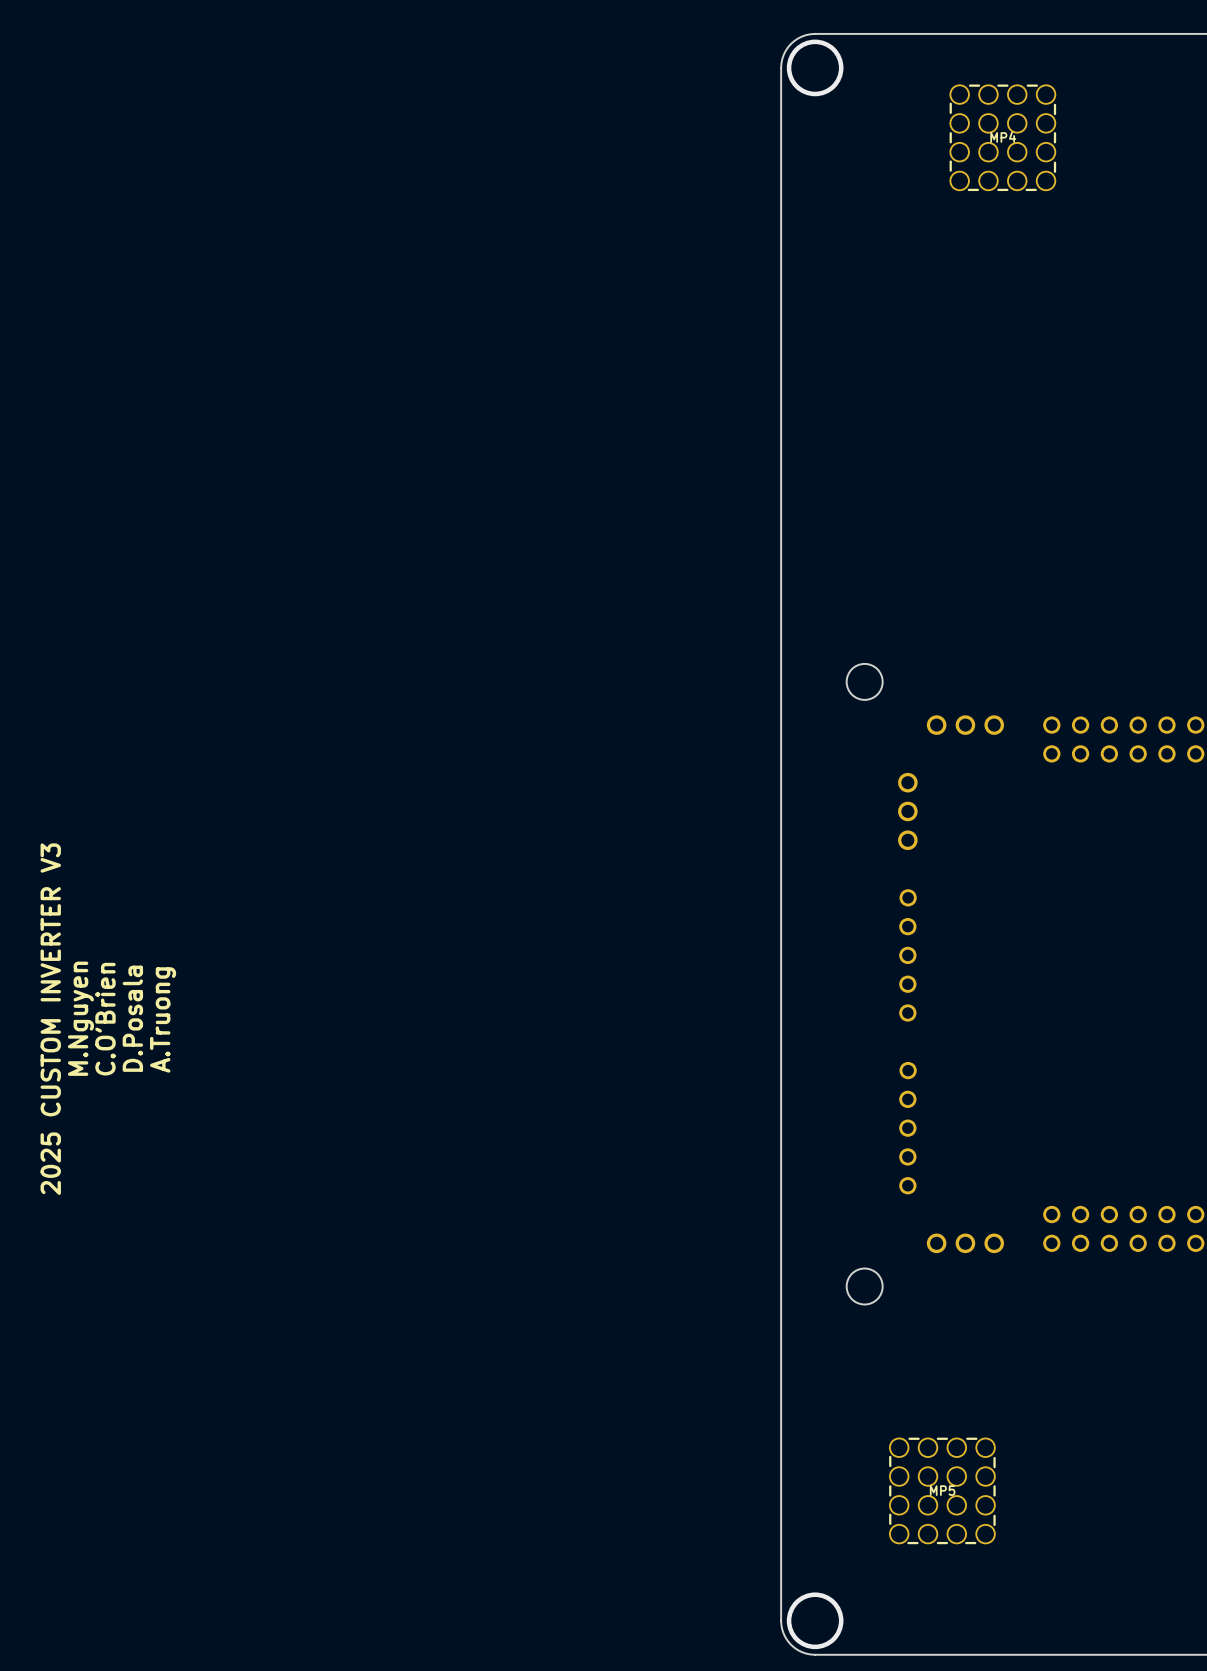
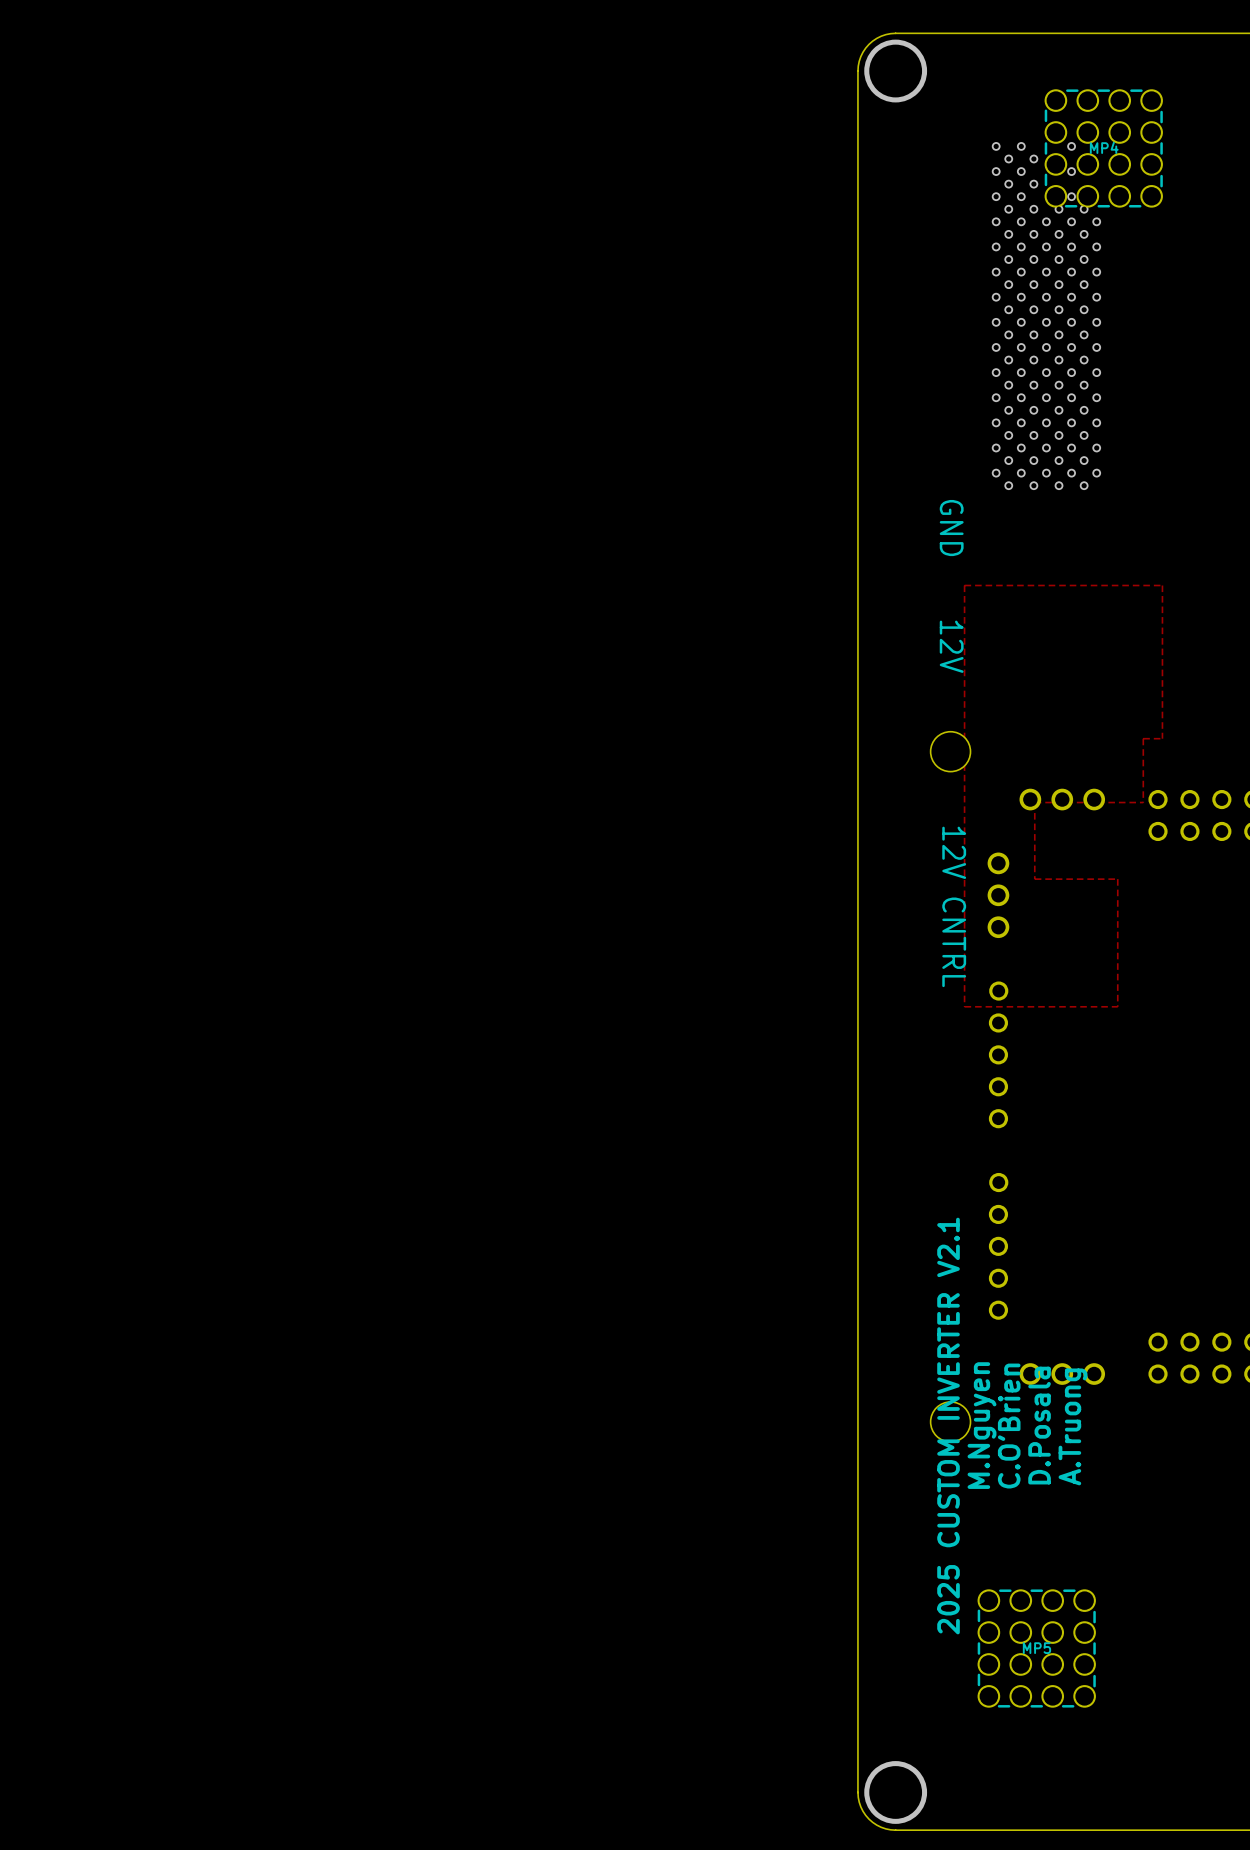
via: none -> (996, 146)
via: none -> (1021, 146)
via: none -> (1071, 146)
via: none -> (1008, 158)
via: none -> (1033, 158)
via: none -> (996, 171)
via: none -> (1021, 171)
via: none -> (1071, 171)
via: none -> (1008, 184)
via: none -> (1033, 184)
via: none -> (996, 196)
via: none -> (1021, 196)
via: none -> (1071, 196)
via: none -> (1008, 209)
via: none -> (1033, 209)
via: none -> (1059, 209)
via: none -> (1084, 209)
via: none -> (996, 221)
via: none -> (1021, 221)
via: none -> (1046, 221)
via: none -> (1071, 221)
via: none -> (1096, 221)
via: none -> (1008, 234)
via: none -> (1033, 234)
via: none -> (1059, 234)
via: none -> (1084, 234)
via: none -> (996, 246)
via: none -> (1021, 246)
via: none -> (1046, 246)
via: none -> (1071, 246)
via: none -> (1096, 246)
via: none -> (1008, 259)
via: none -> (1033, 259)
via: none -> (1059, 259)
via: none -> (1084, 259)
via: none -> (996, 272)
via: none -> (1021, 272)
via: none -> (1046, 272)
via: none -> (1071, 272)
via: none -> (1096, 272)
via: none -> (1008, 284)
via: none -> (1033, 284)
via: none -> (1059, 284)
via: none -> (1084, 284)
via: none -> (996, 297)
via: none -> (1021, 297)
via: none -> (1046, 297)
via: none -> (1071, 297)
via: none -> (1096, 297)
via: none -> (1008, 309)
via: none -> (1033, 309)
via: none -> (1059, 309)
via: none -> (1084, 309)
via: none -> (996, 322)
via: none -> (1021, 322)
via: none -> (1046, 322)
via: none -> (1071, 322)
via: none -> (1096, 322)
via: none -> (1008, 334)
via: none -> (1033, 334)
via: none -> (1059, 334)
via: none -> (1084, 334)
via: none -> (996, 347)
via: none -> (1021, 347)
via: none -> (1046, 347)
via: none -> (1071, 347)
via: none -> (1096, 347)
via: none -> (1008, 360)
via: none -> (1033, 360)
via: none -> (1059, 360)
via: none -> (1084, 360)
via: none -> (996, 372)
via: none -> (1021, 372)
via: none -> (1046, 372)
via: none -> (1071, 372)
via: none -> (1096, 372)
via: none -> (1008, 385)
via: none -> (1033, 385)
via: none -> (1059, 385)
via: none -> (1084, 385)
via: none -> (996, 397)
via: none -> (1021, 397)
via: none -> (1046, 397)
via: none -> (1071, 397)
via: none -> (1096, 397)
via: none -> (1008, 410)
via: none -> (1033, 410)
via: none -> (1059, 410)
via: none -> (1084, 410)
via: none -> (996, 422)
via: none -> (1021, 422)
via: none -> (1046, 422)
via: none -> (1071, 422)
via: none -> (1096, 422)
via: none -> (1008, 435)
via: none -> (1033, 435)
via: none -> (1059, 435)
via: none -> (1084, 435)
via: none -> (996, 447)
via: none -> (1021, 447)
via: none -> (1046, 447)
via: none -> (1071, 447)
via: none -> (1096, 447)
via: none -> (1008, 460)
via: none -> (1033, 460)
via: none -> (1059, 460)
via: none -> (1084, 460)
via: none -> (996, 473)
via: none -> (1021, 473)
via: none -> (1046, 473)
via: none -> (1071, 473)
via: none -> (1096, 473)
via: none -> (1008, 485)
via: none -> (1033, 485)
via: none -> (1059, 485)
via: none -> (1084, 485)
text: none -> GND (951, 528)
zone outline: none -> (964, 585) (1162, 585) (1162, 738) (1143, 738) (1143, 802) (1034, 802) (1034, 879) (1117, 879) (1117, 1006) (964, 1006) (964, 585)
text: none -> 12V (951, 646)
text: none -> 12V CNTRL (954, 906)
text: M.Nguyen (80, 1018) -> none
text: D.Posala (132, 1018) -> none
text: 2025 CUSTOM INVERTER V3 (50, 1019) -> none
text: C.O'Brien (105, 1019) -> none
text: A.Truong (163, 1019) -> none
text: none -> M.Nguyen (982, 1425)
text: none -> D.Posala (1039, 1425)
text: none -> 2025 CUSTOM INVERTER V2.1 (948, 1426)
text: none -> C.O'Brien (1009, 1426)
text: none -> A.Truong (1073, 1426)

